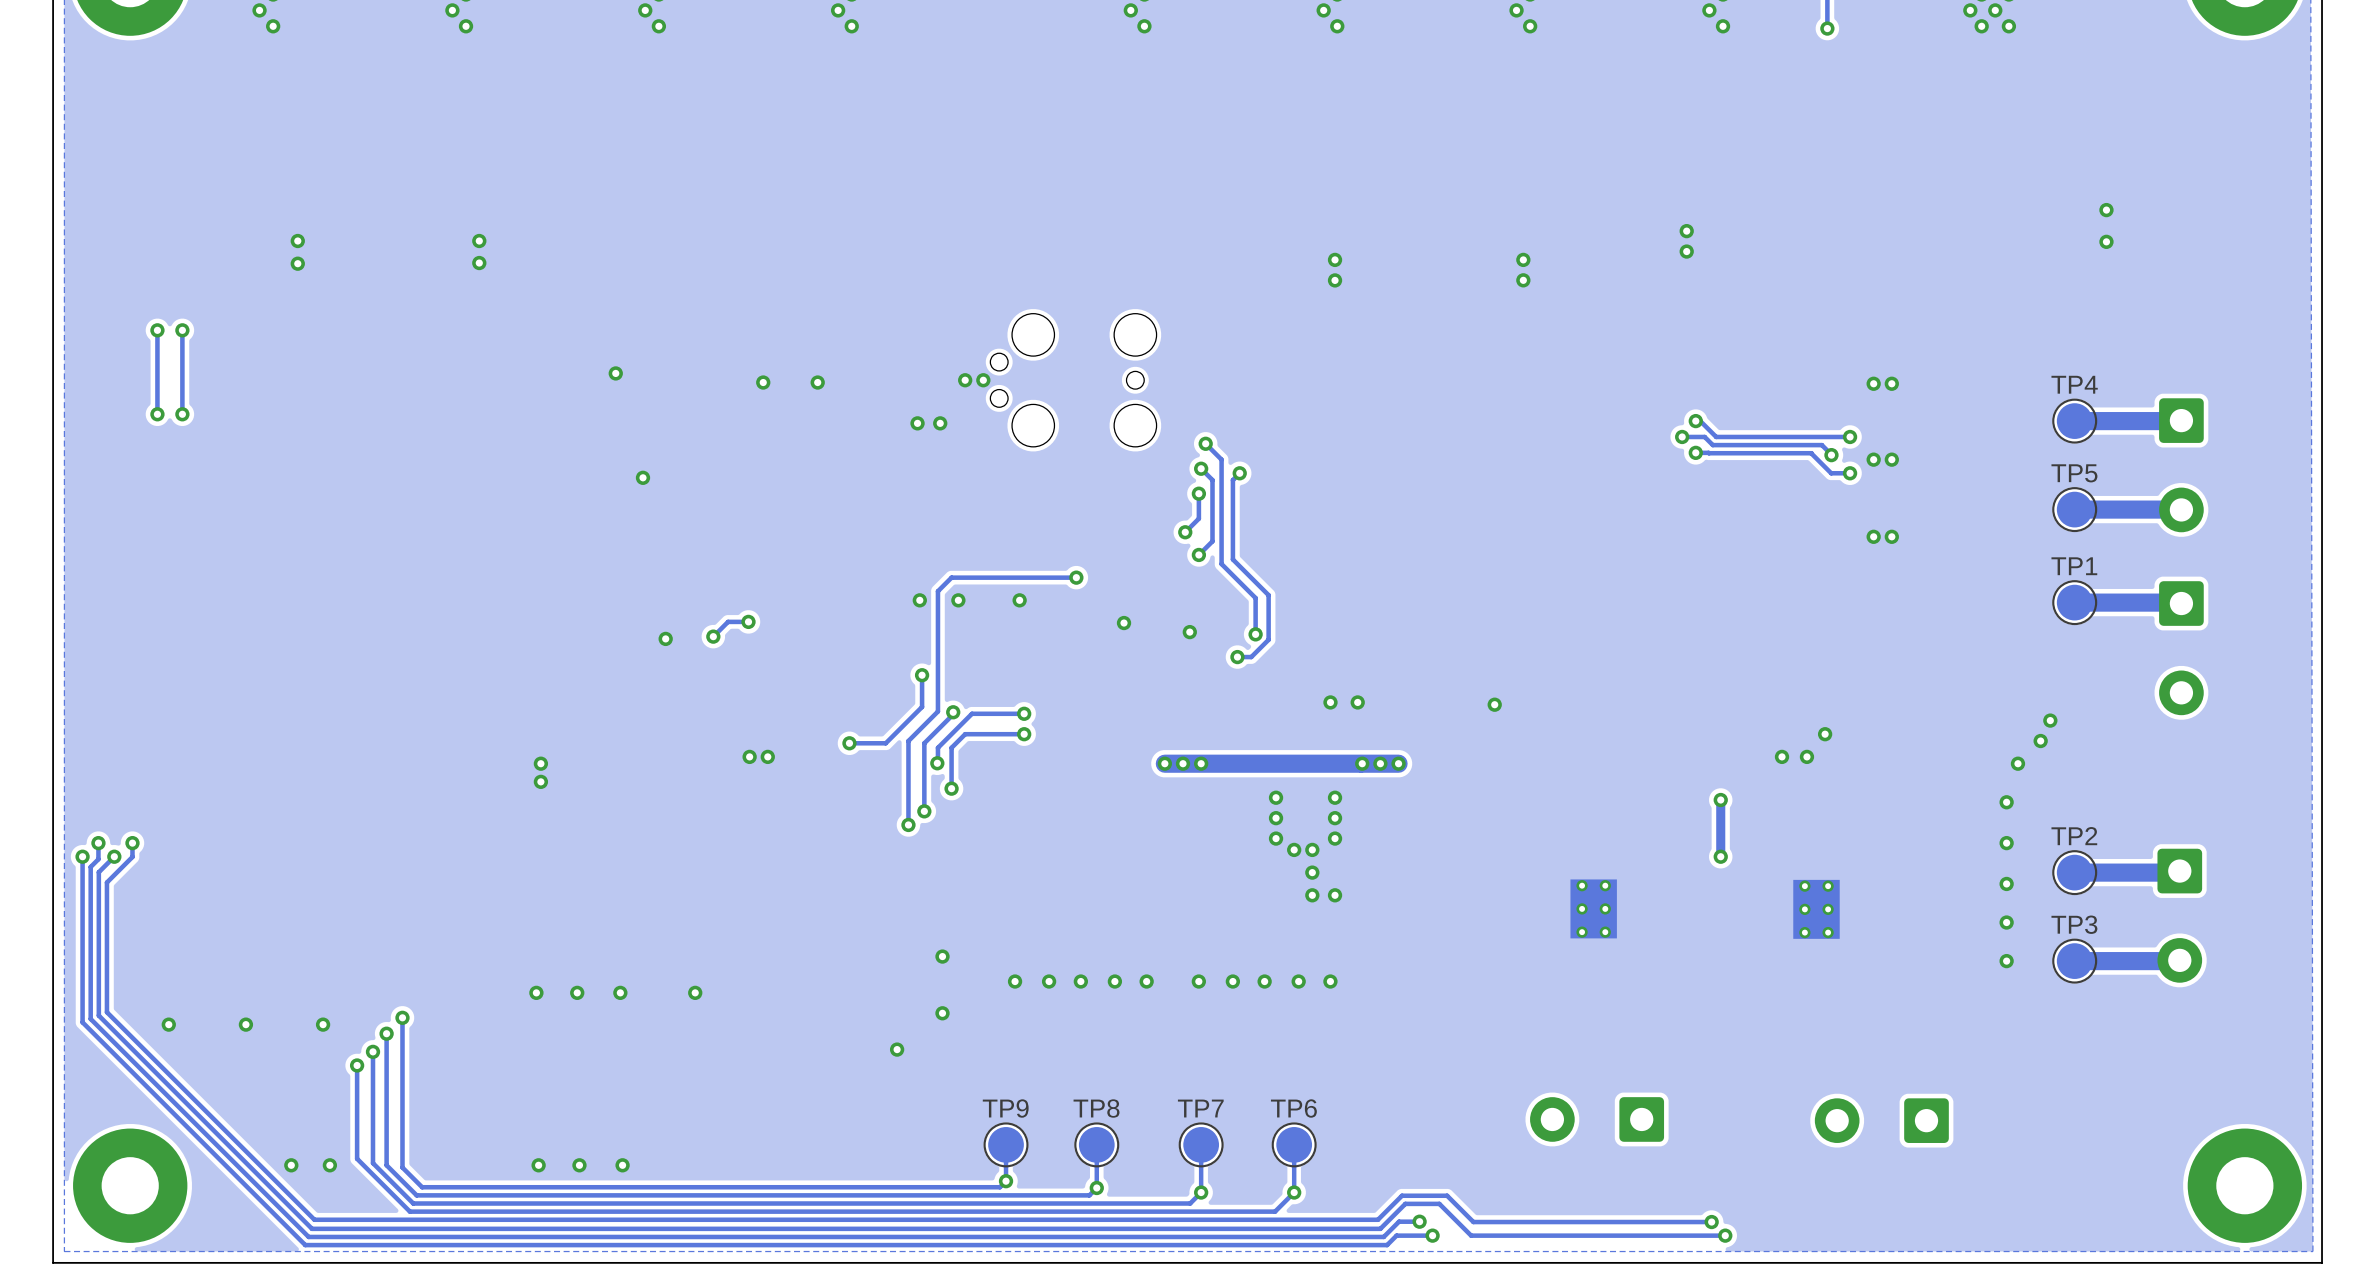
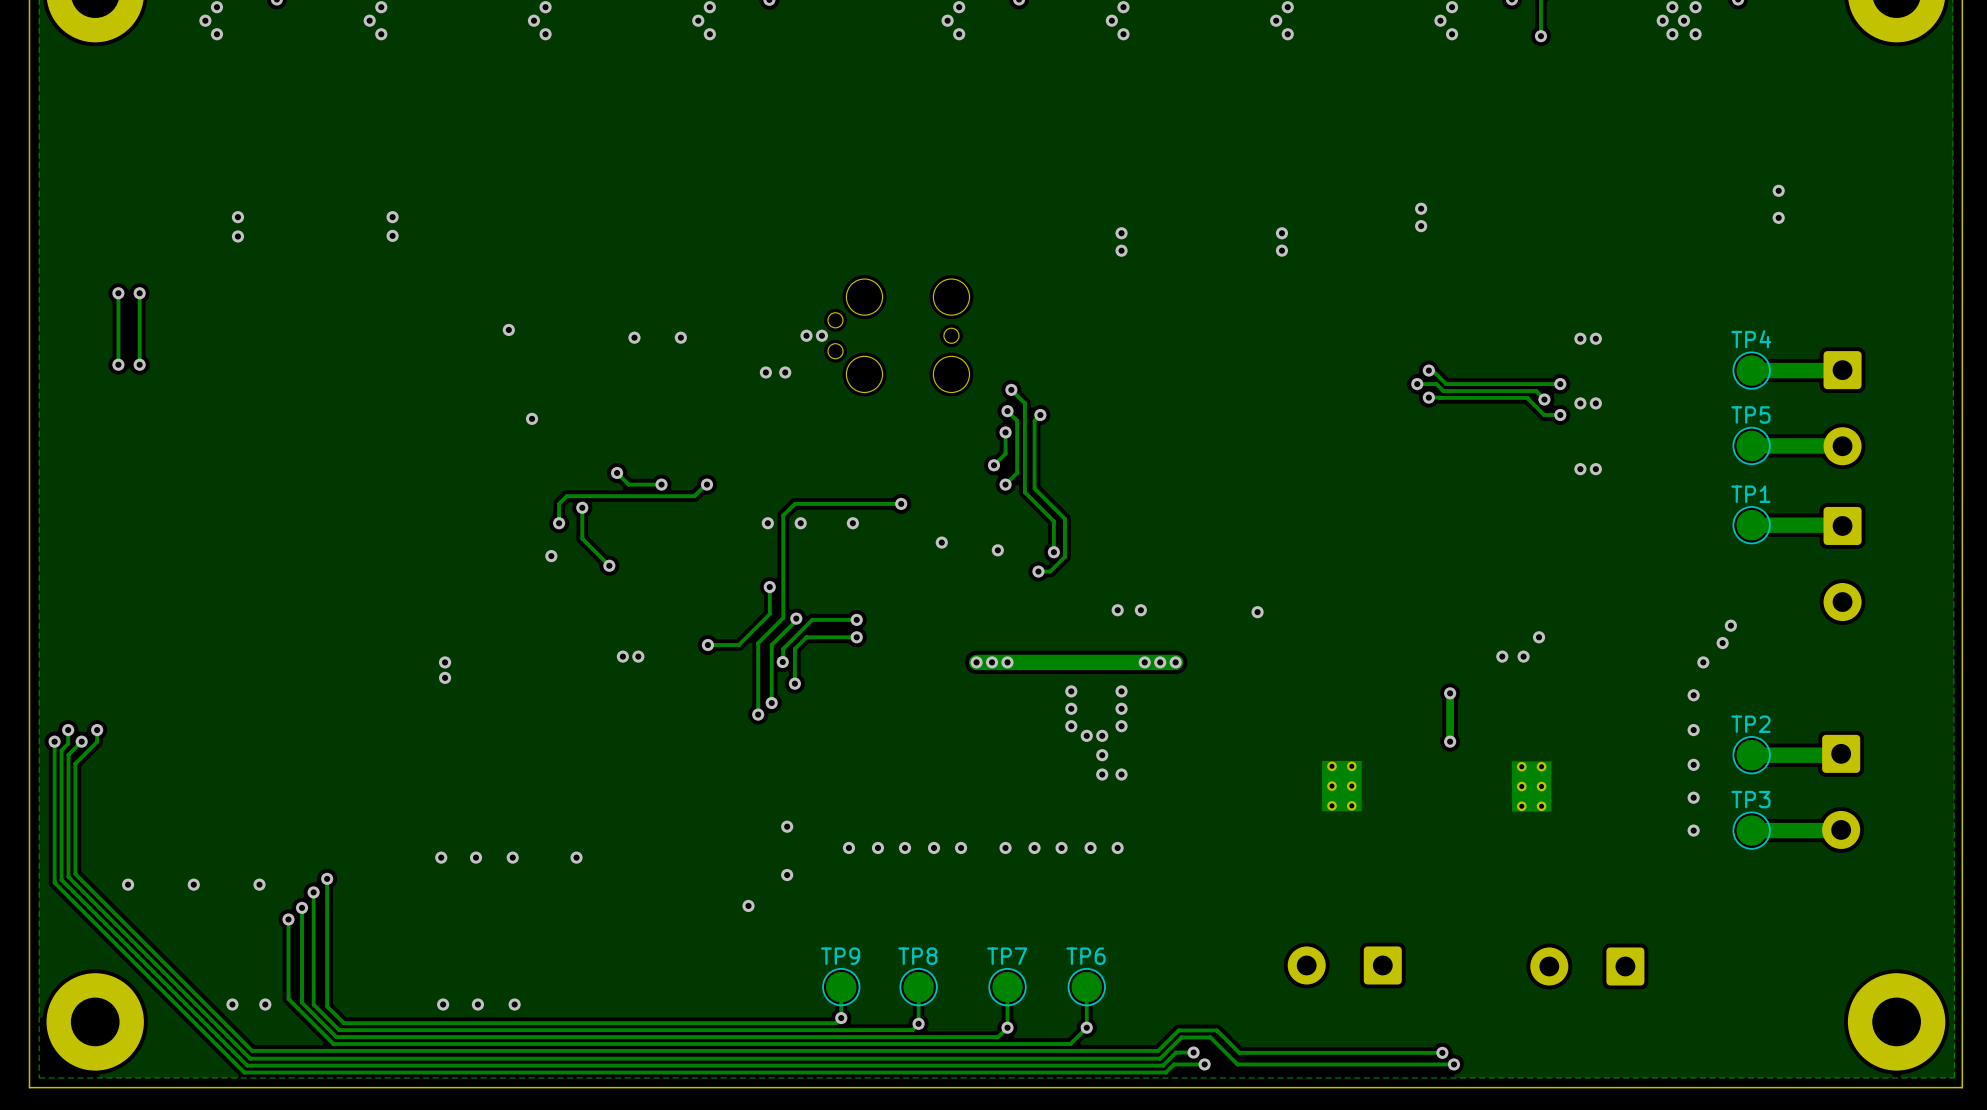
track: none -> (617, 472) (628, 484) (661, 484)
via: none -> (617, 472)
via: none -> (661, 484)
track: none -> (705, 484) (694, 496) (566, 496) (559, 503) (559, 523)
via: none -> (706, 484)
track: none -> (582, 507) (582, 538) (609, 565)
via: none -> (582, 507)
via: none -> (559, 523)
track: (748, 621) (728, 621) (713, 636) -> none
via: (748, 621) -> none
via: (713, 636) -> none
via: none -> (609, 565)

